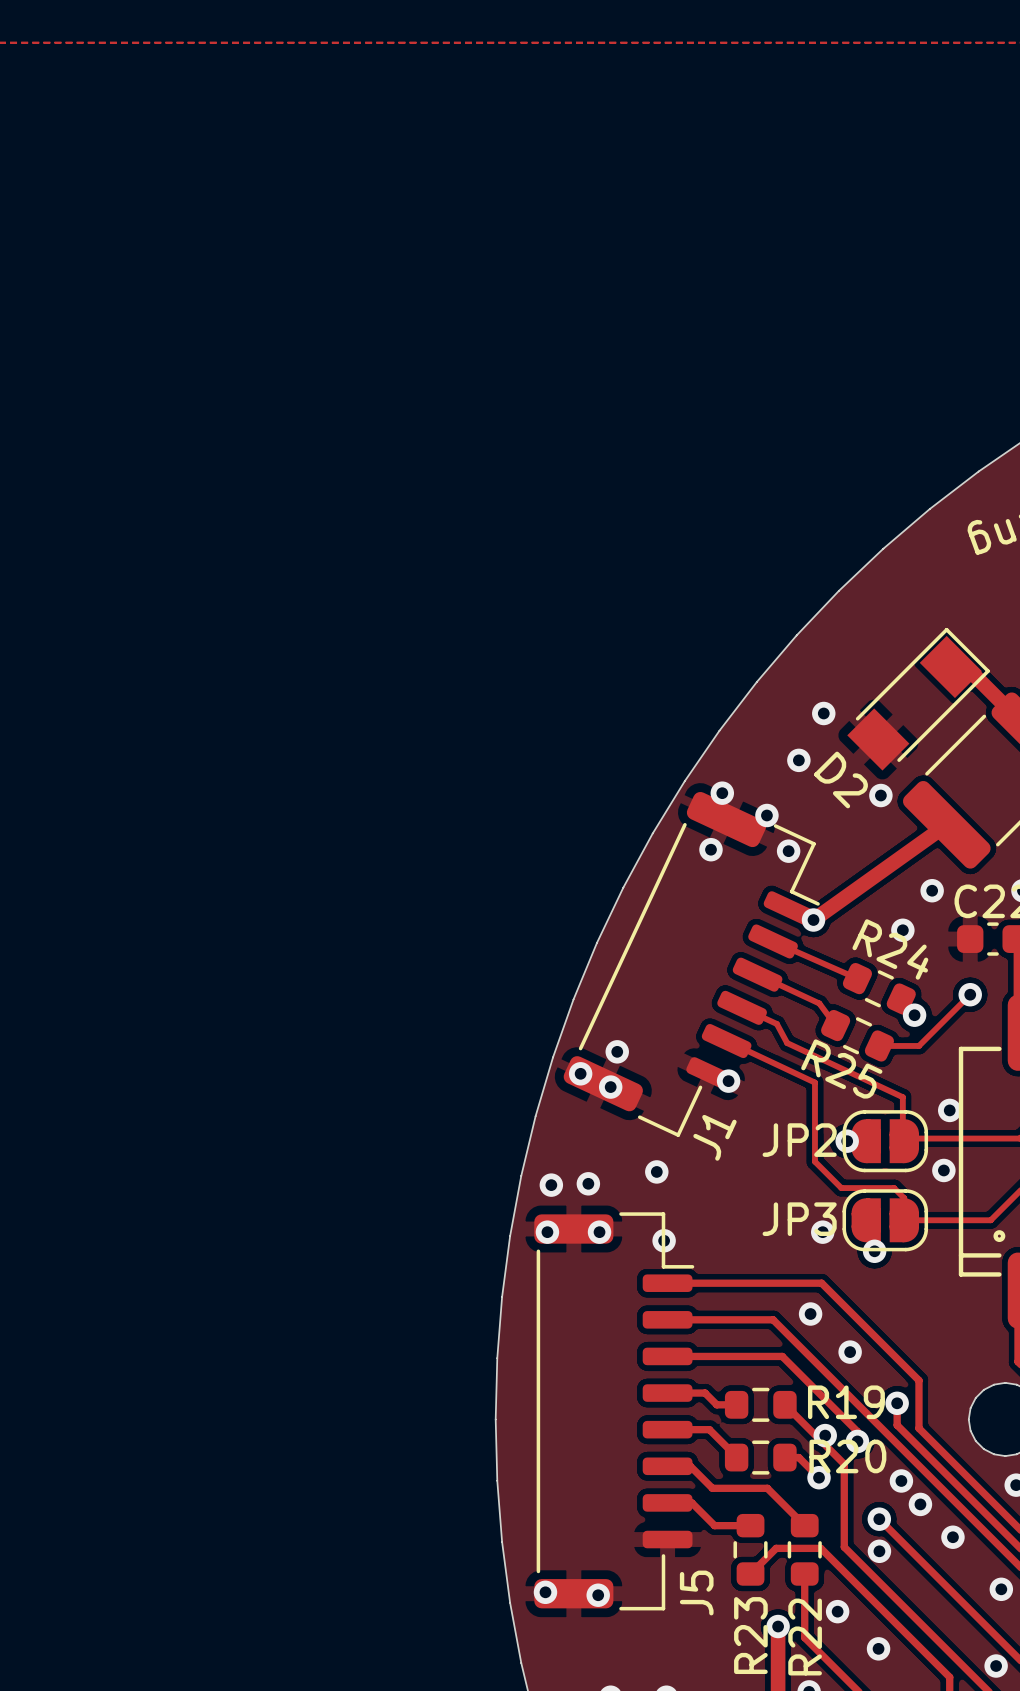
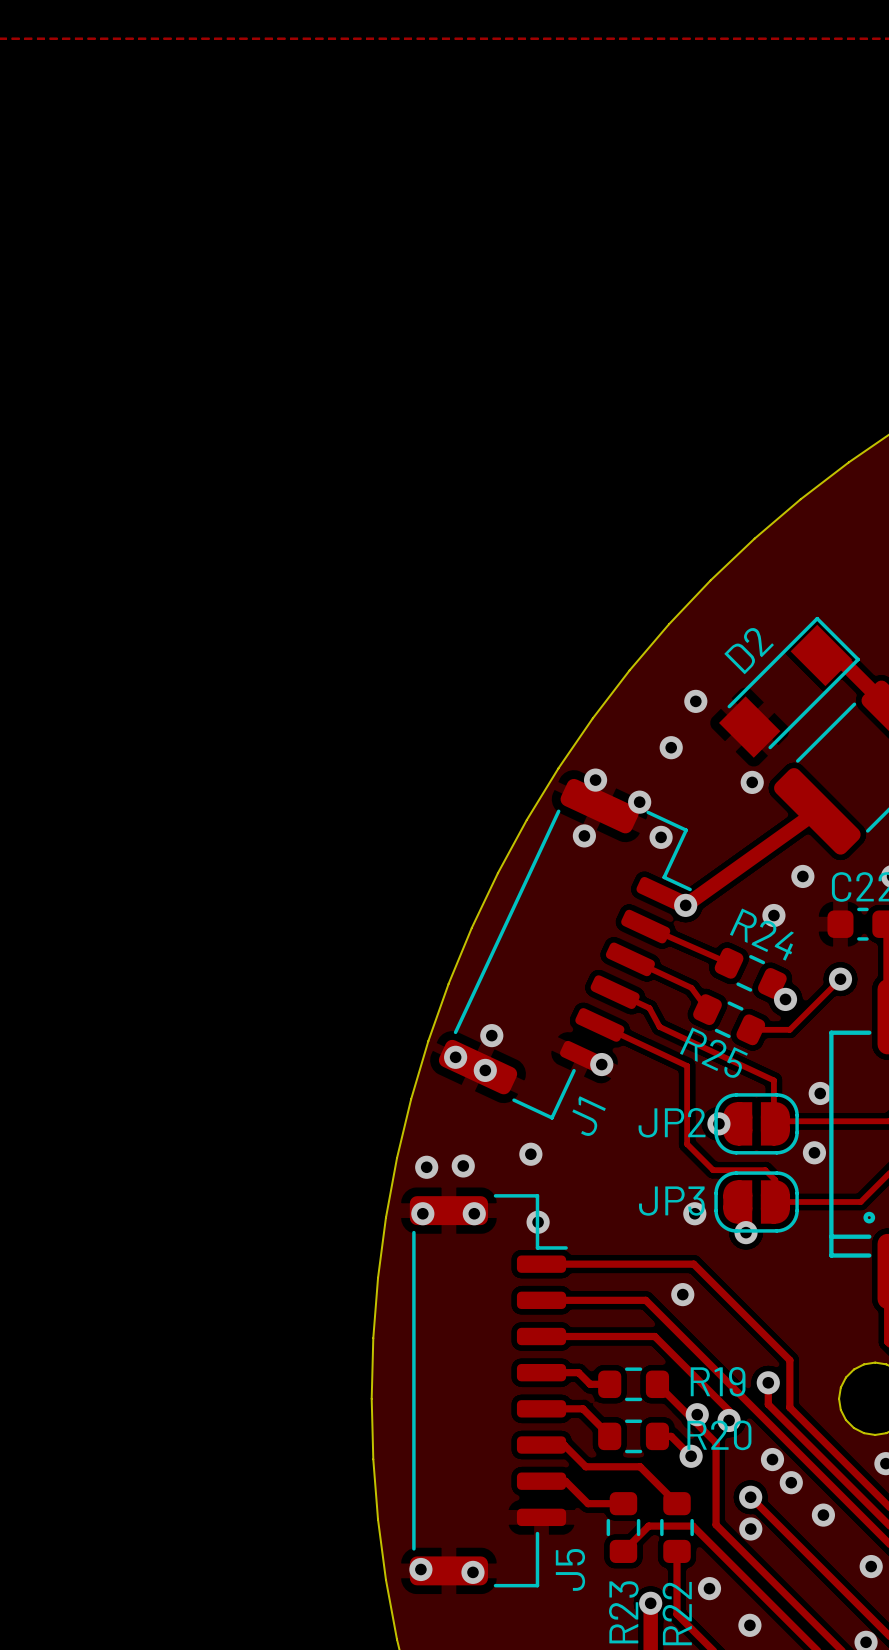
D2 name rotation: 0° (841, 780) -> 90° counterclockwise (749, 651)
D2 name position: D2 (841, 780) -> D2 (749, 651)
via: (850, 1352) -> none

